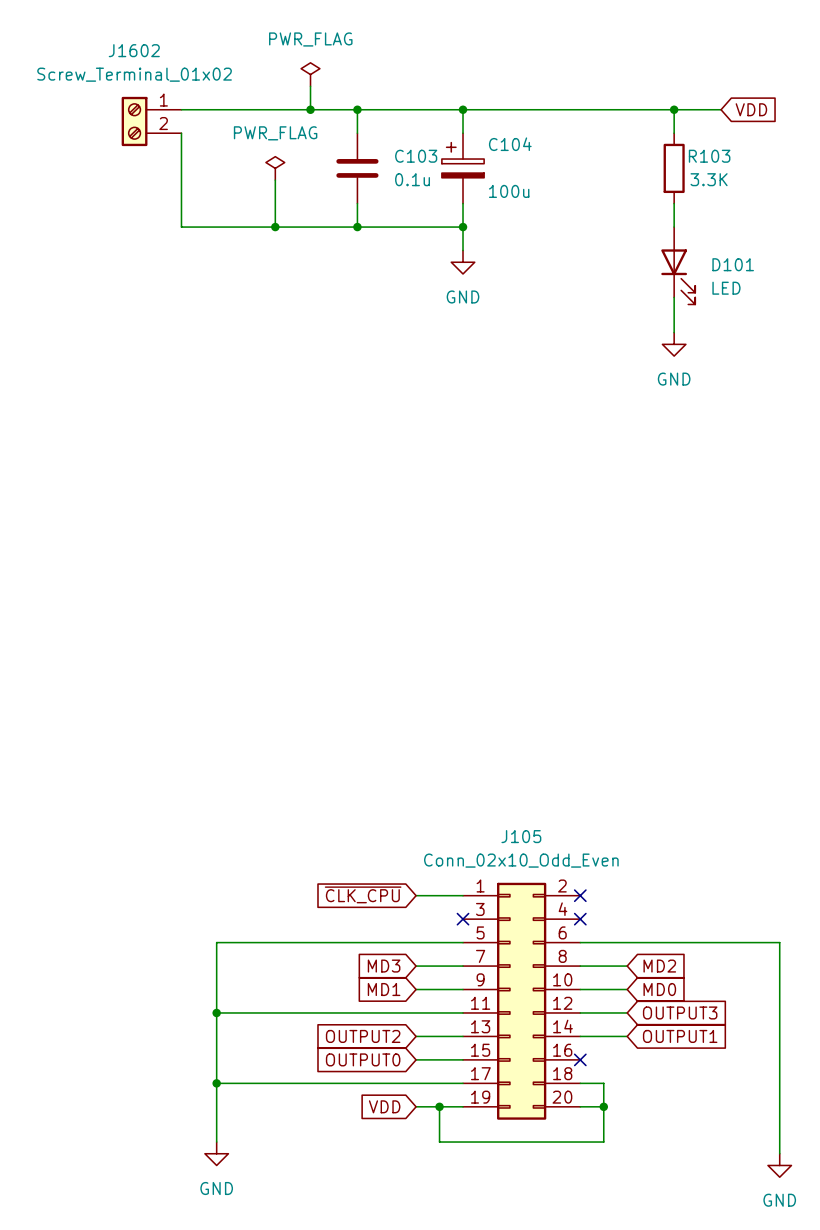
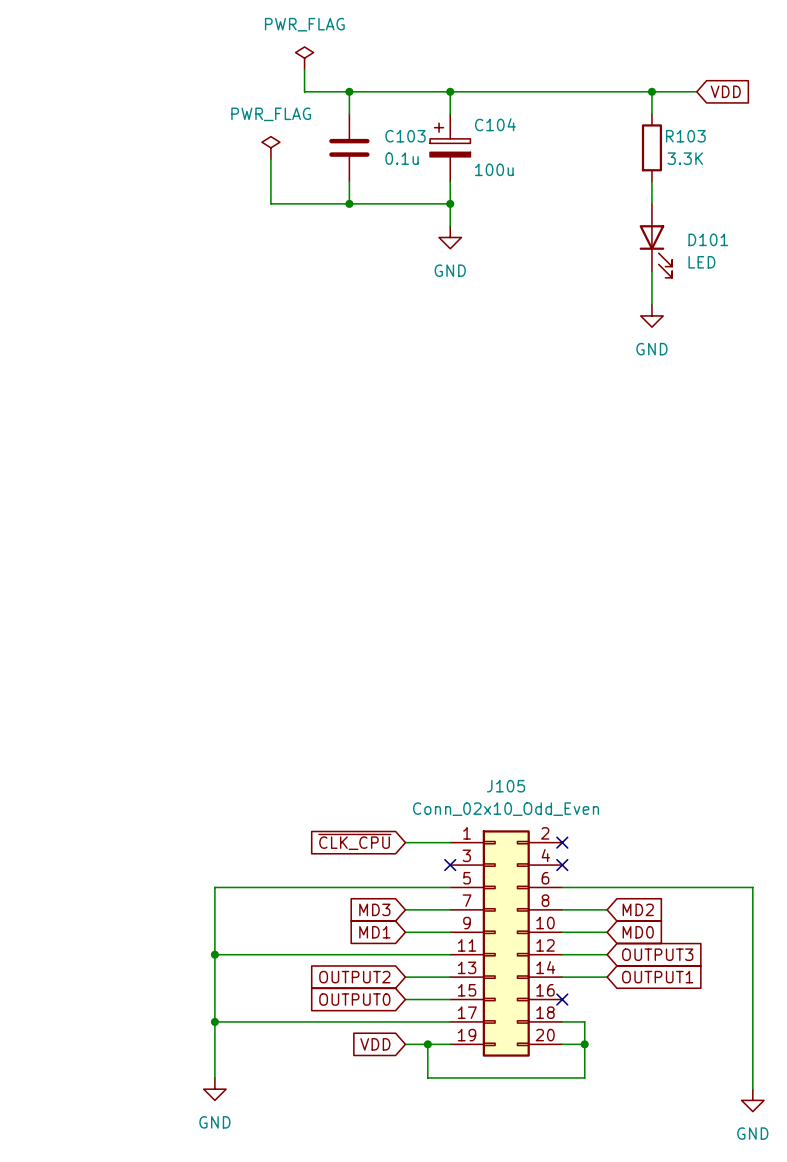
wire: (181, 109) (310, 109) -> none
junction: (310, 109) -> none
J1602: Screw_Terminal_01x02 (151, 121) -> none
wire: (181, 133) (181, 227) (275, 227) -> none
junction: (275, 227) -> none

